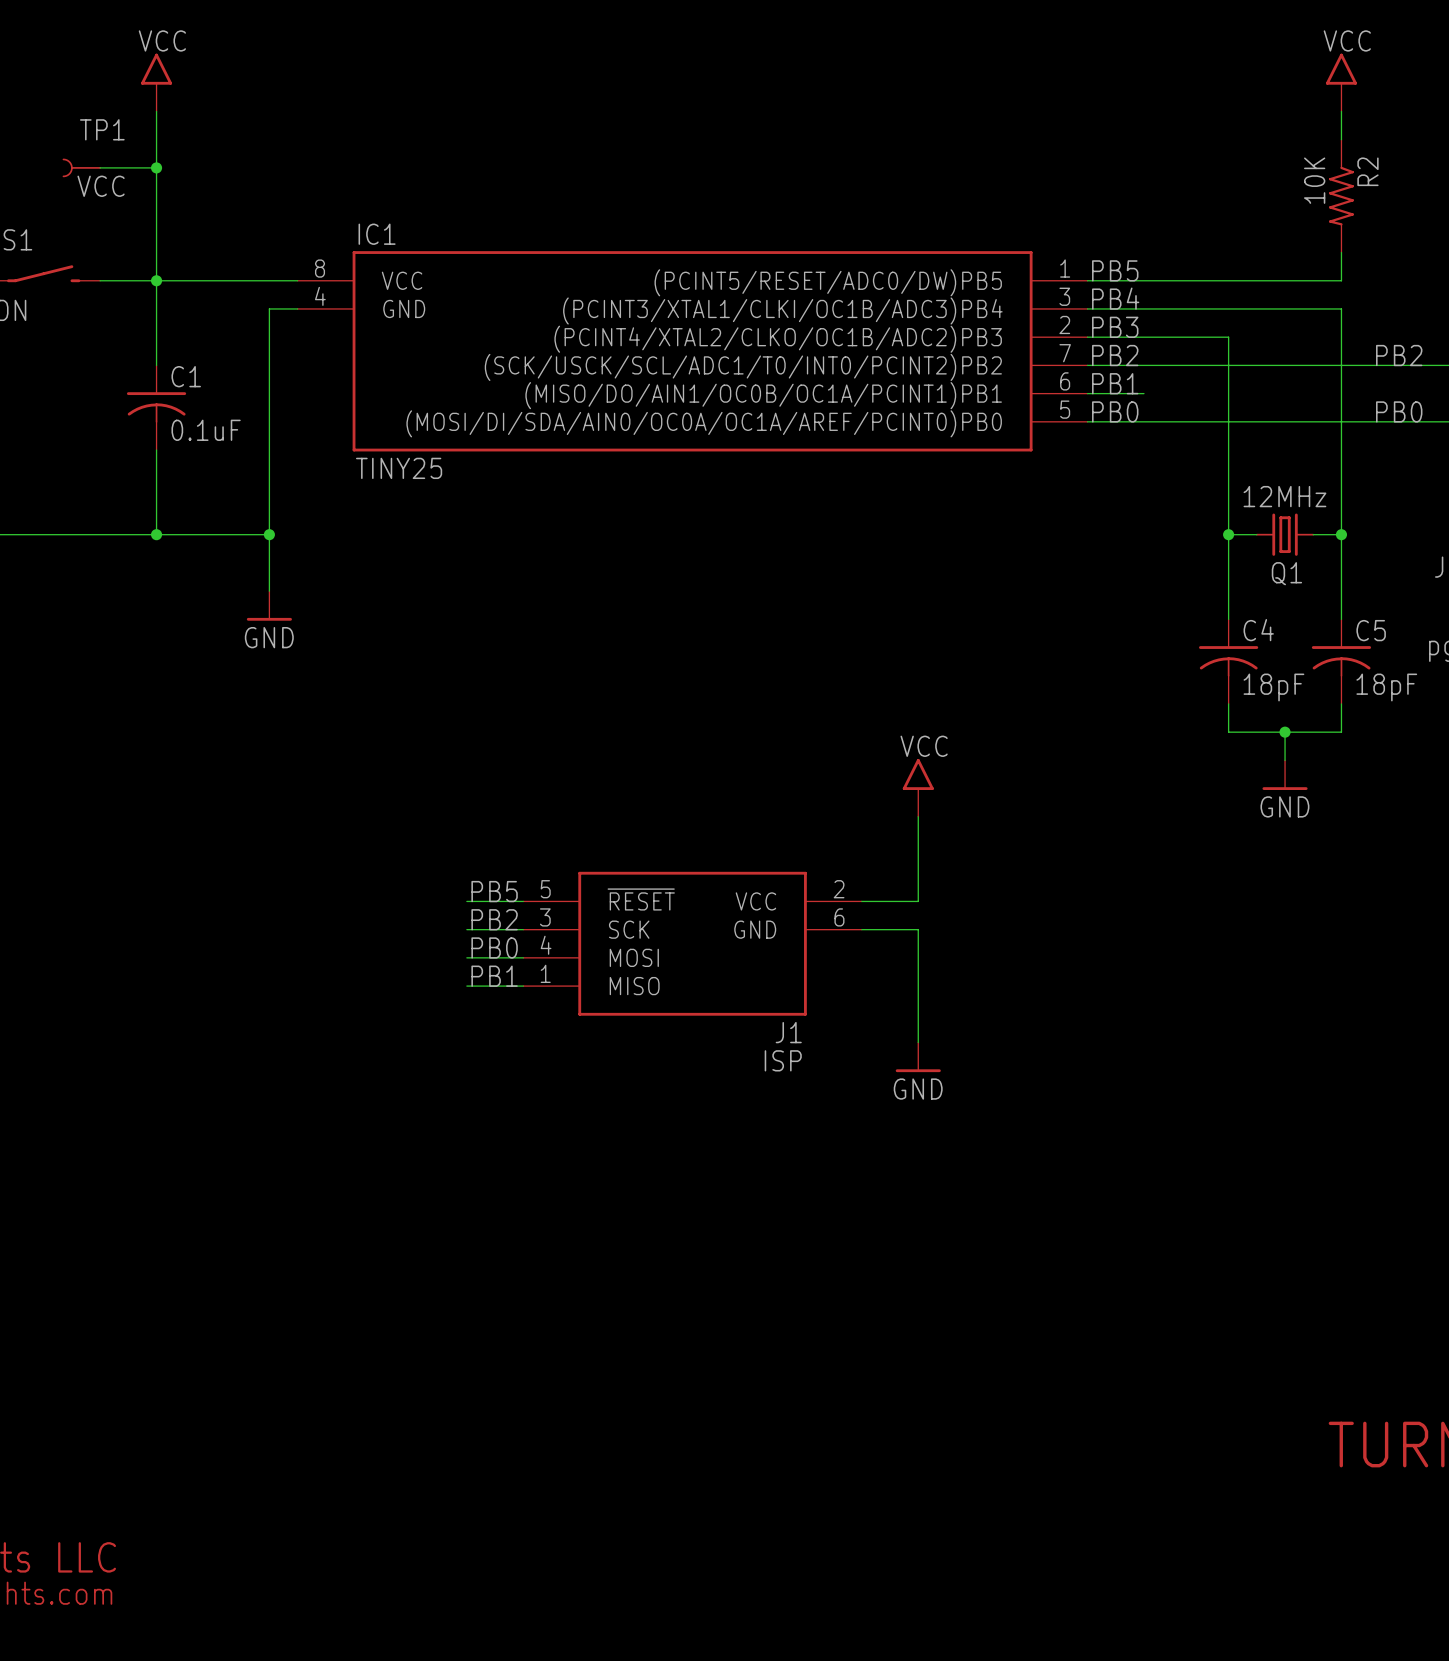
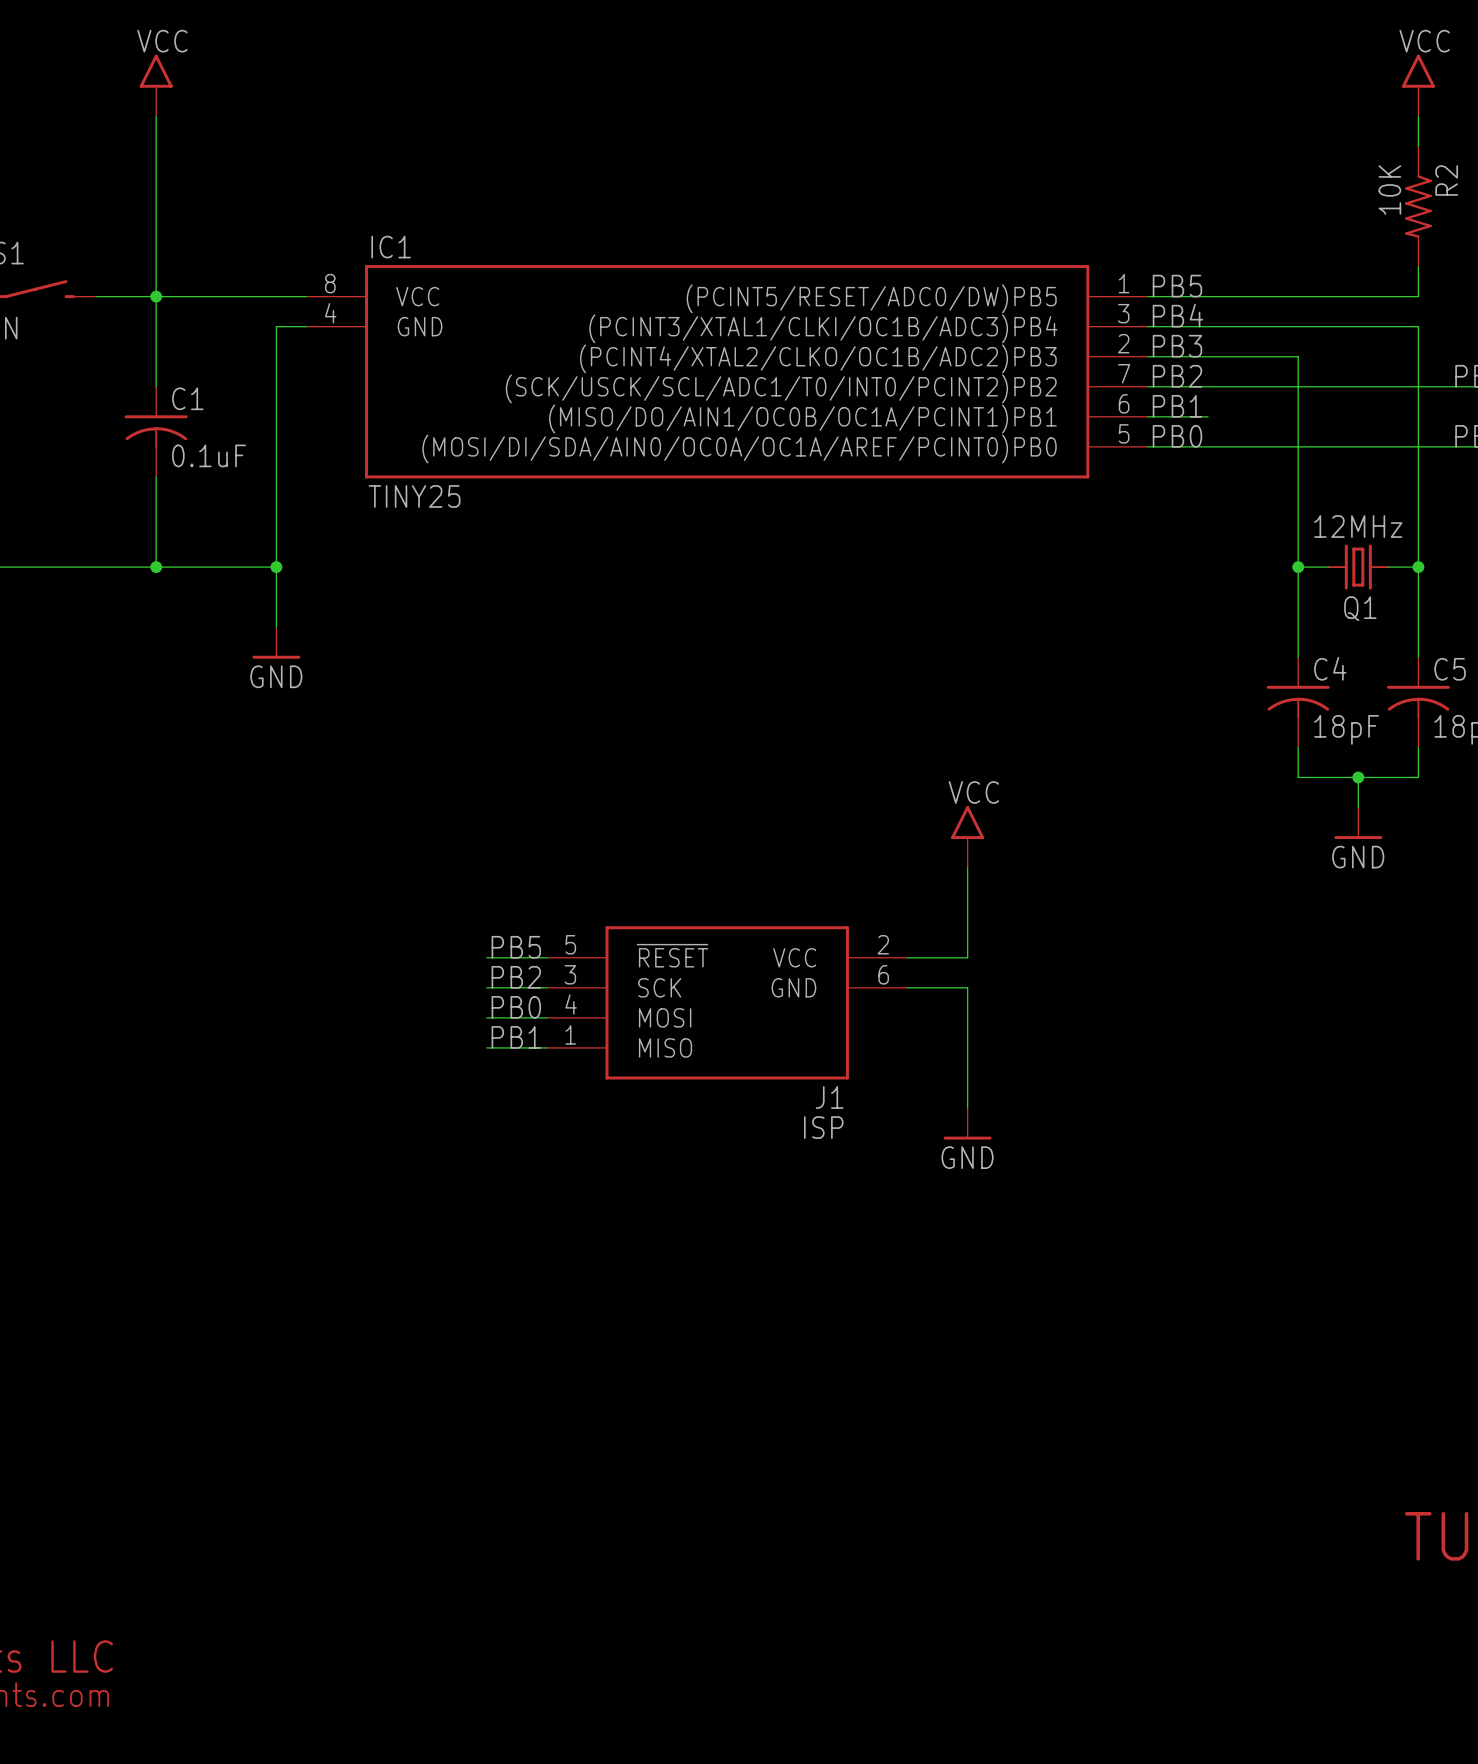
TP1: VCC (81, 167) -> none
wire: (100, 167) (156, 167) -> none
junction: (156, 167) -> none

